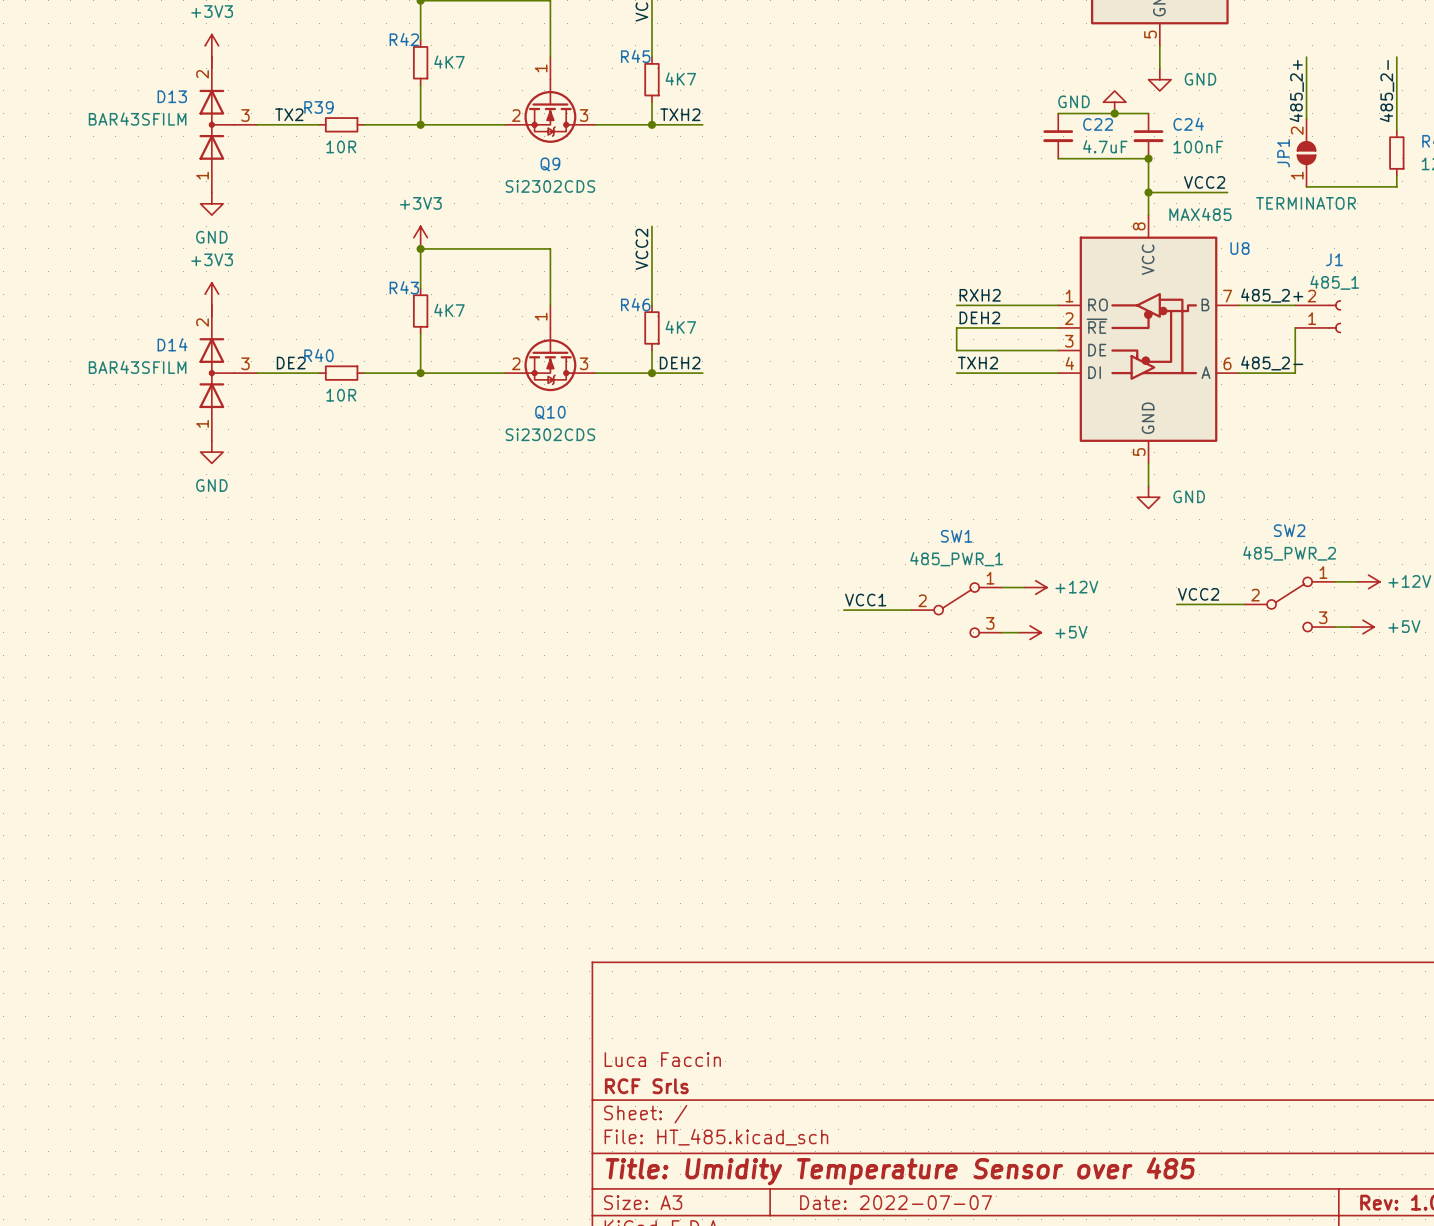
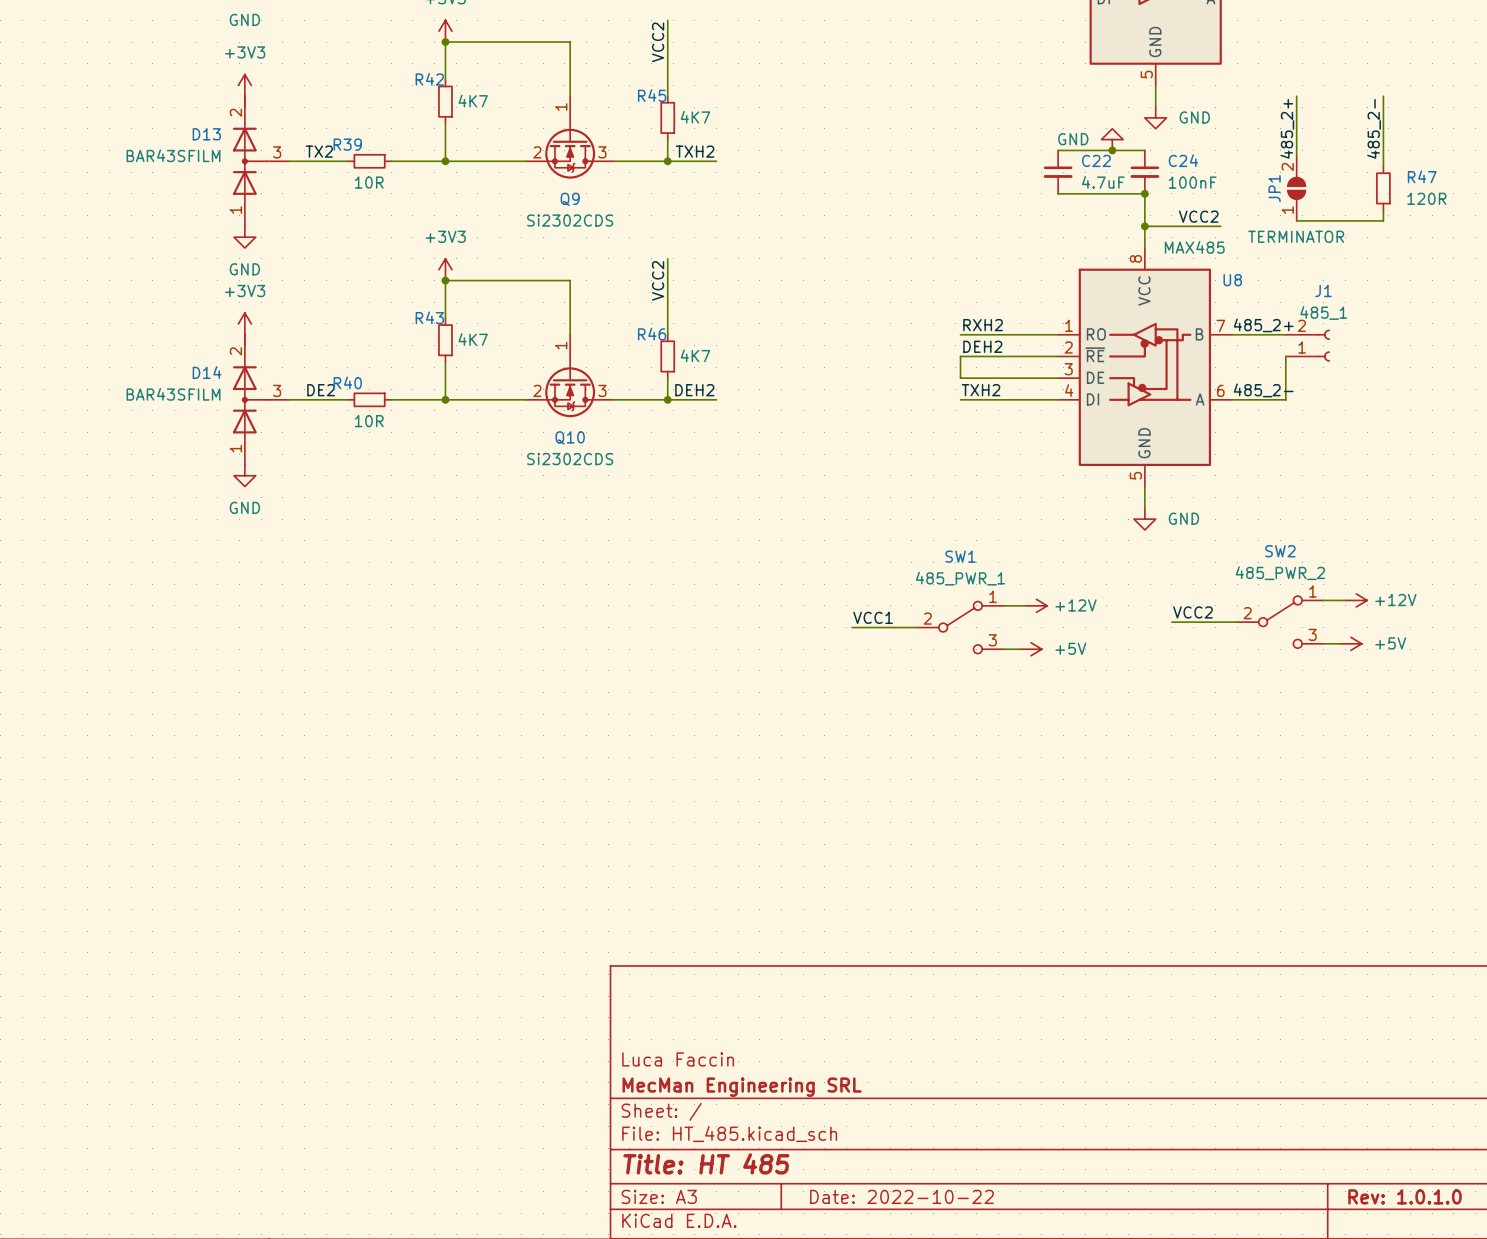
title block: RCF Srls (646, 1086) -> MecMan Engineering SRL (742, 1087)
title block: Title: Umidity Temperature Sensor over 485 (900, 1171) -> Title: HT 485 (706, 1163)
title block: Date: 2022-07-07 (896, 1202) -> Date: 2022-10-22 (901, 1196)

